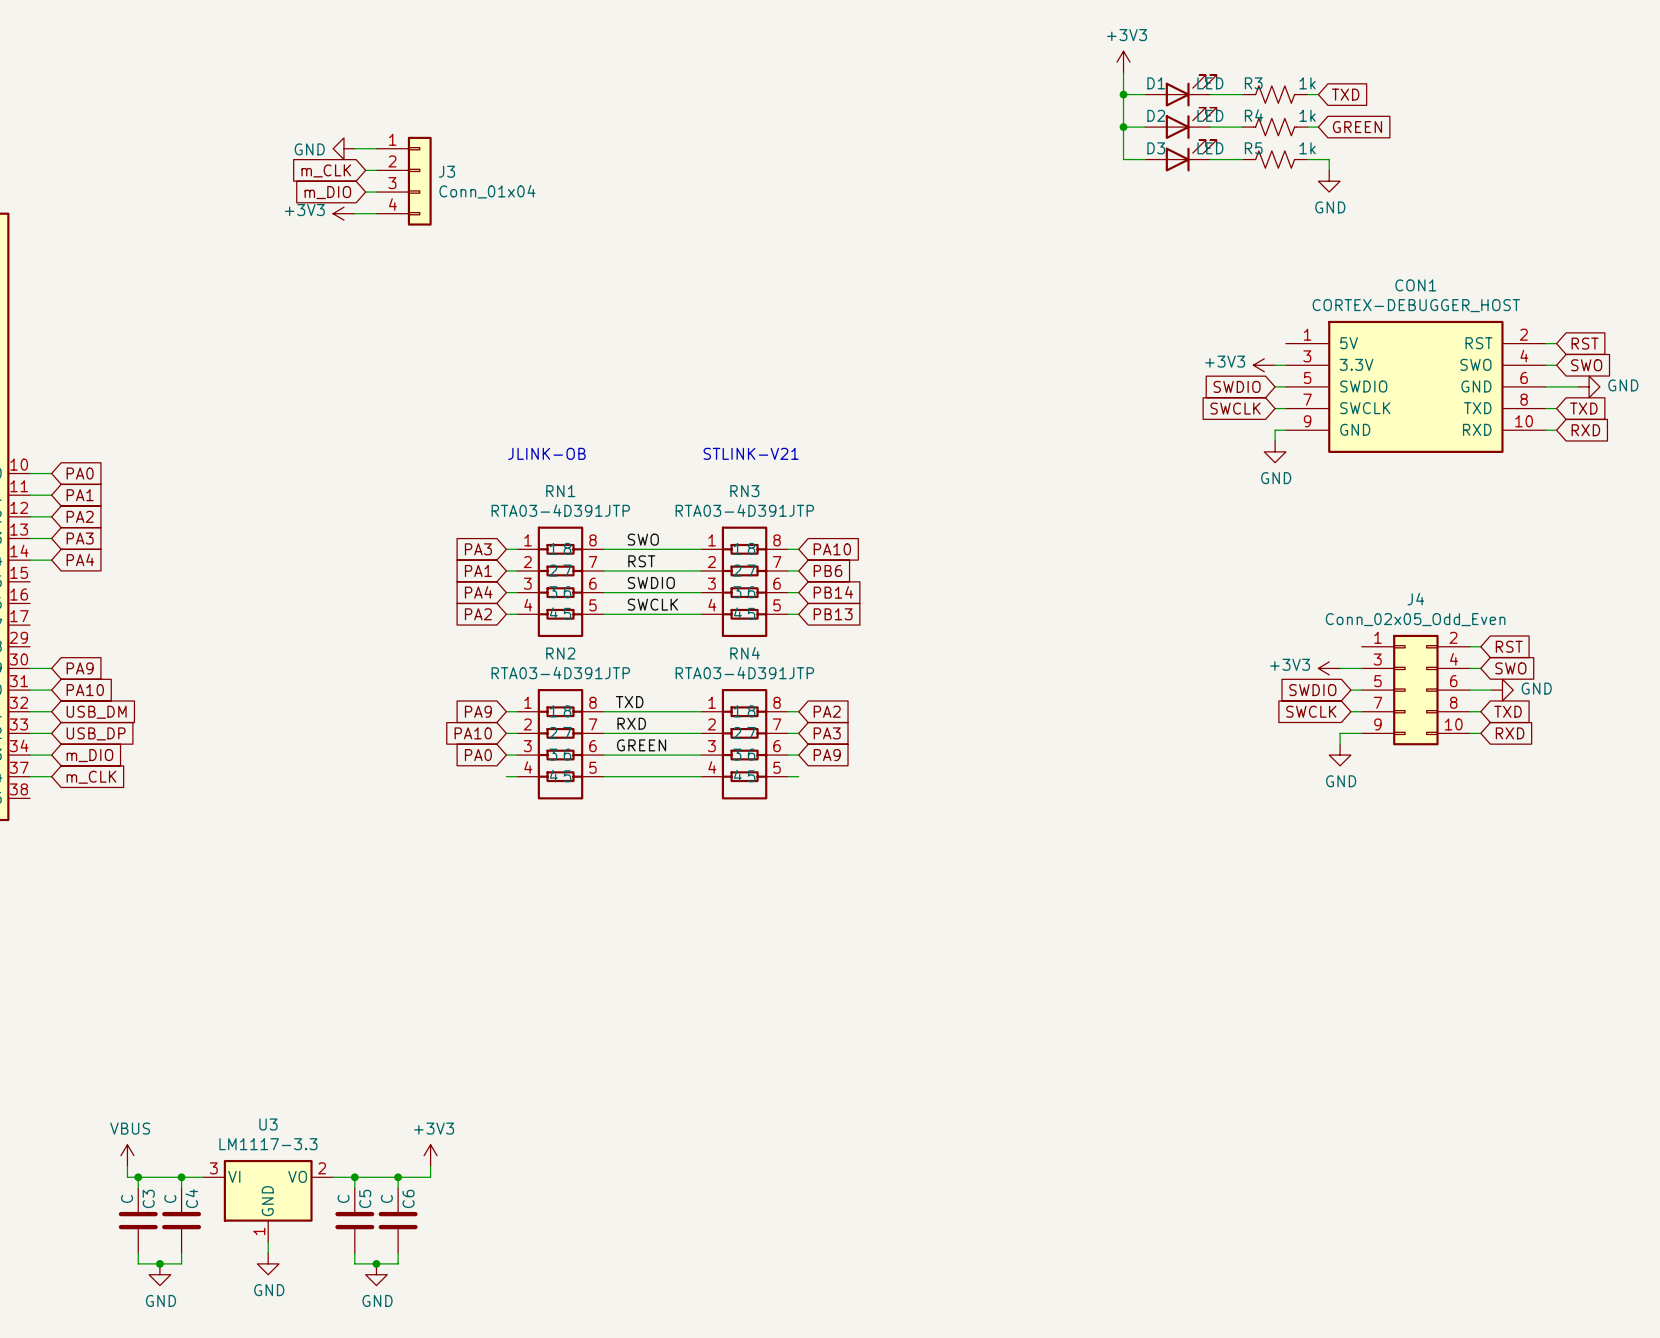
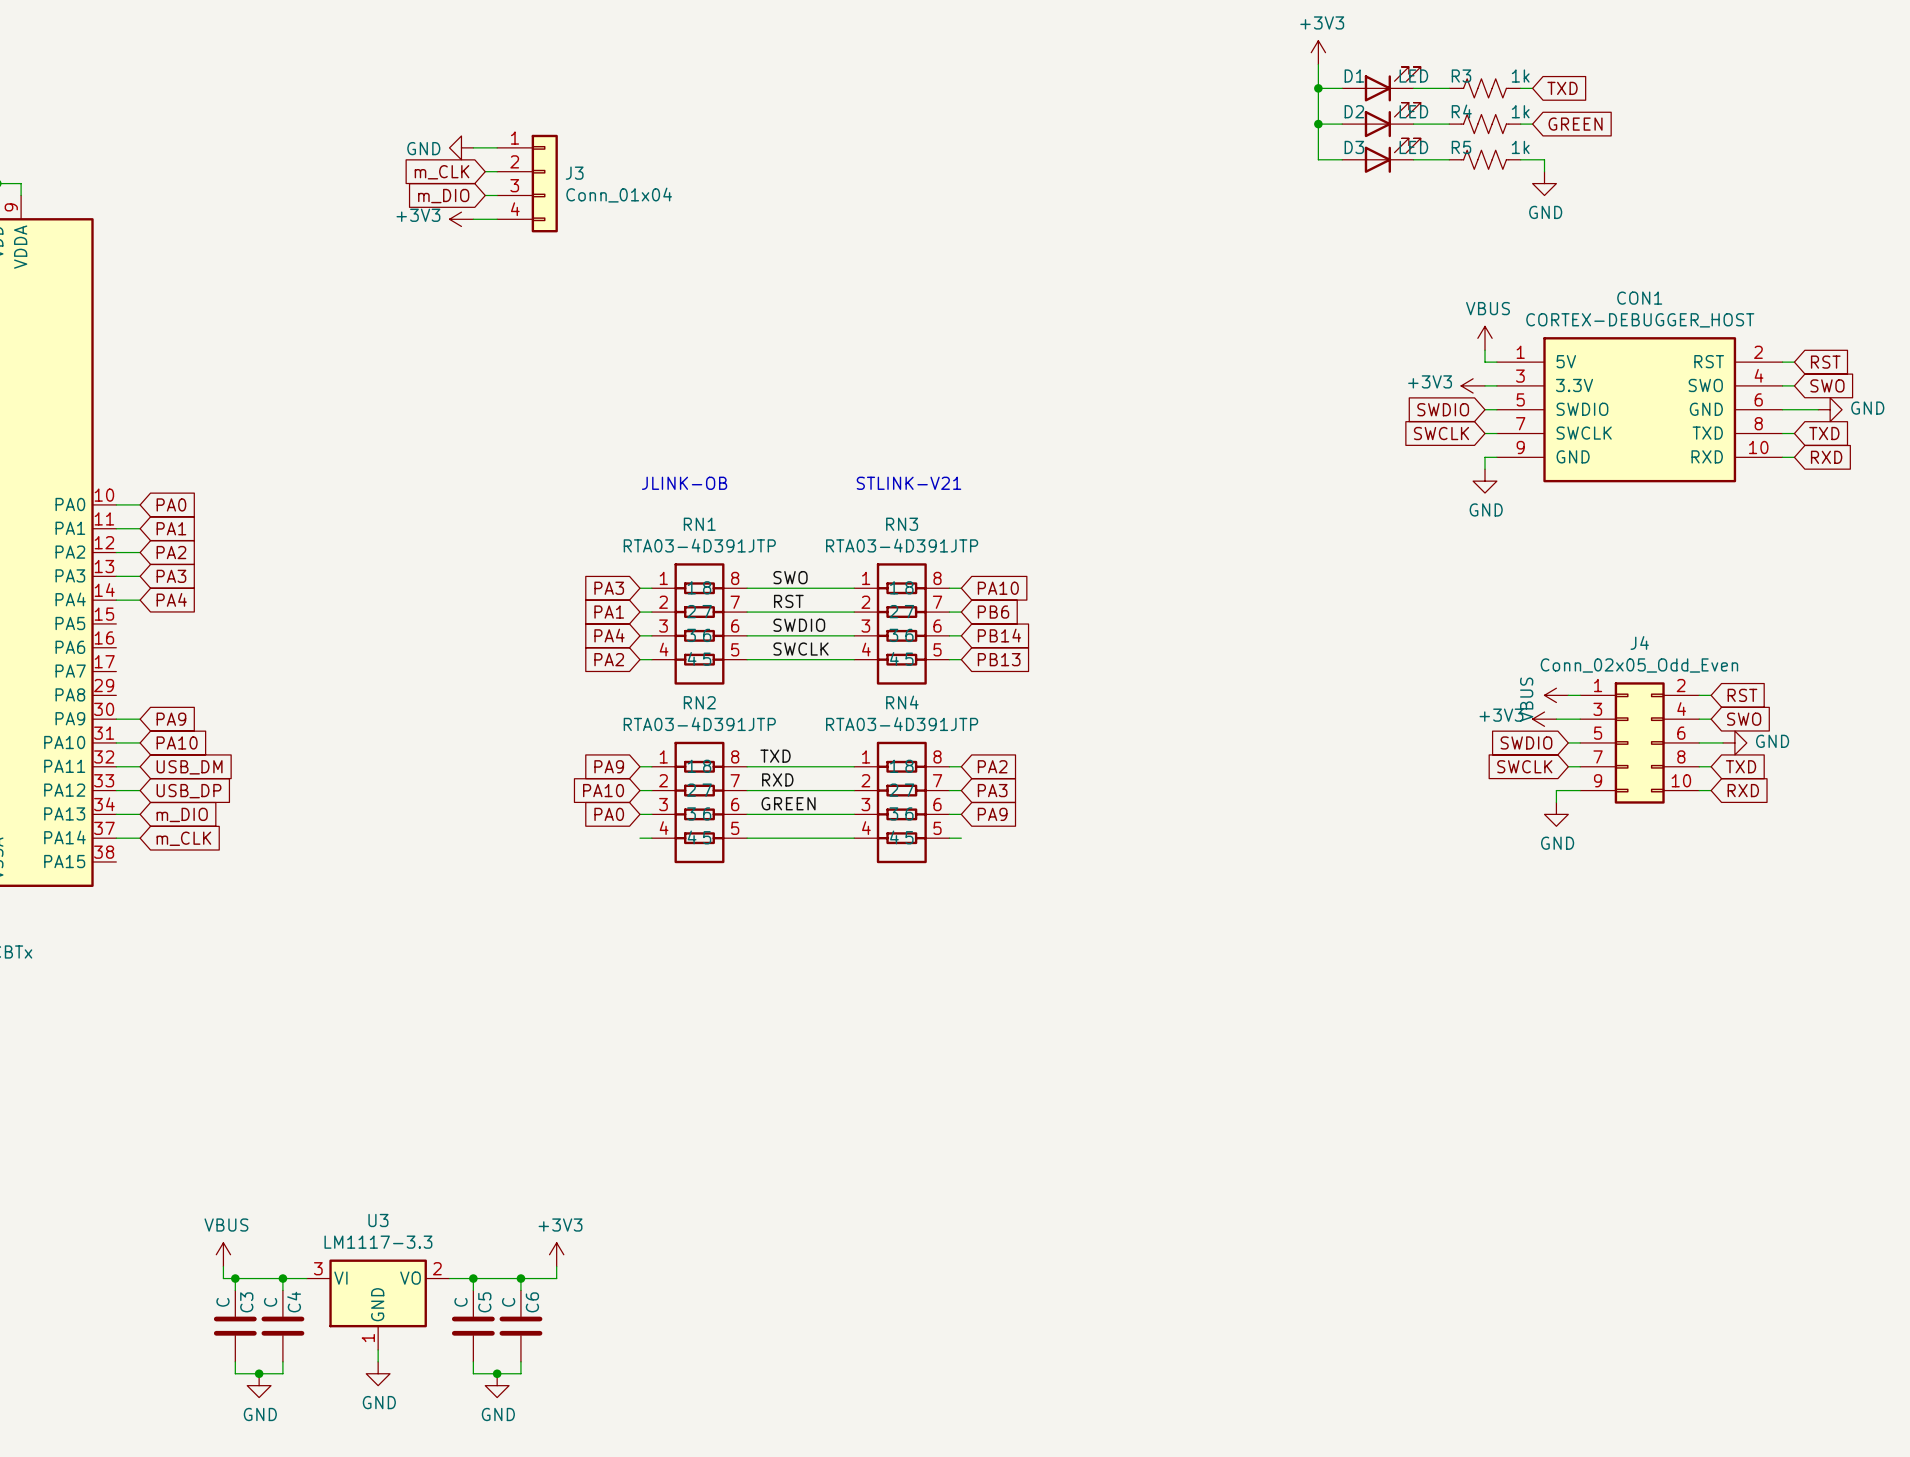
power symbol: none -> VBUS (1485, 338)
wire: none -> (1485, 350) (1485, 362) (1496, 362)
power symbol: none -> VBUS (1556, 695)
wire: none -> (1568, 695) (1580, 695)

